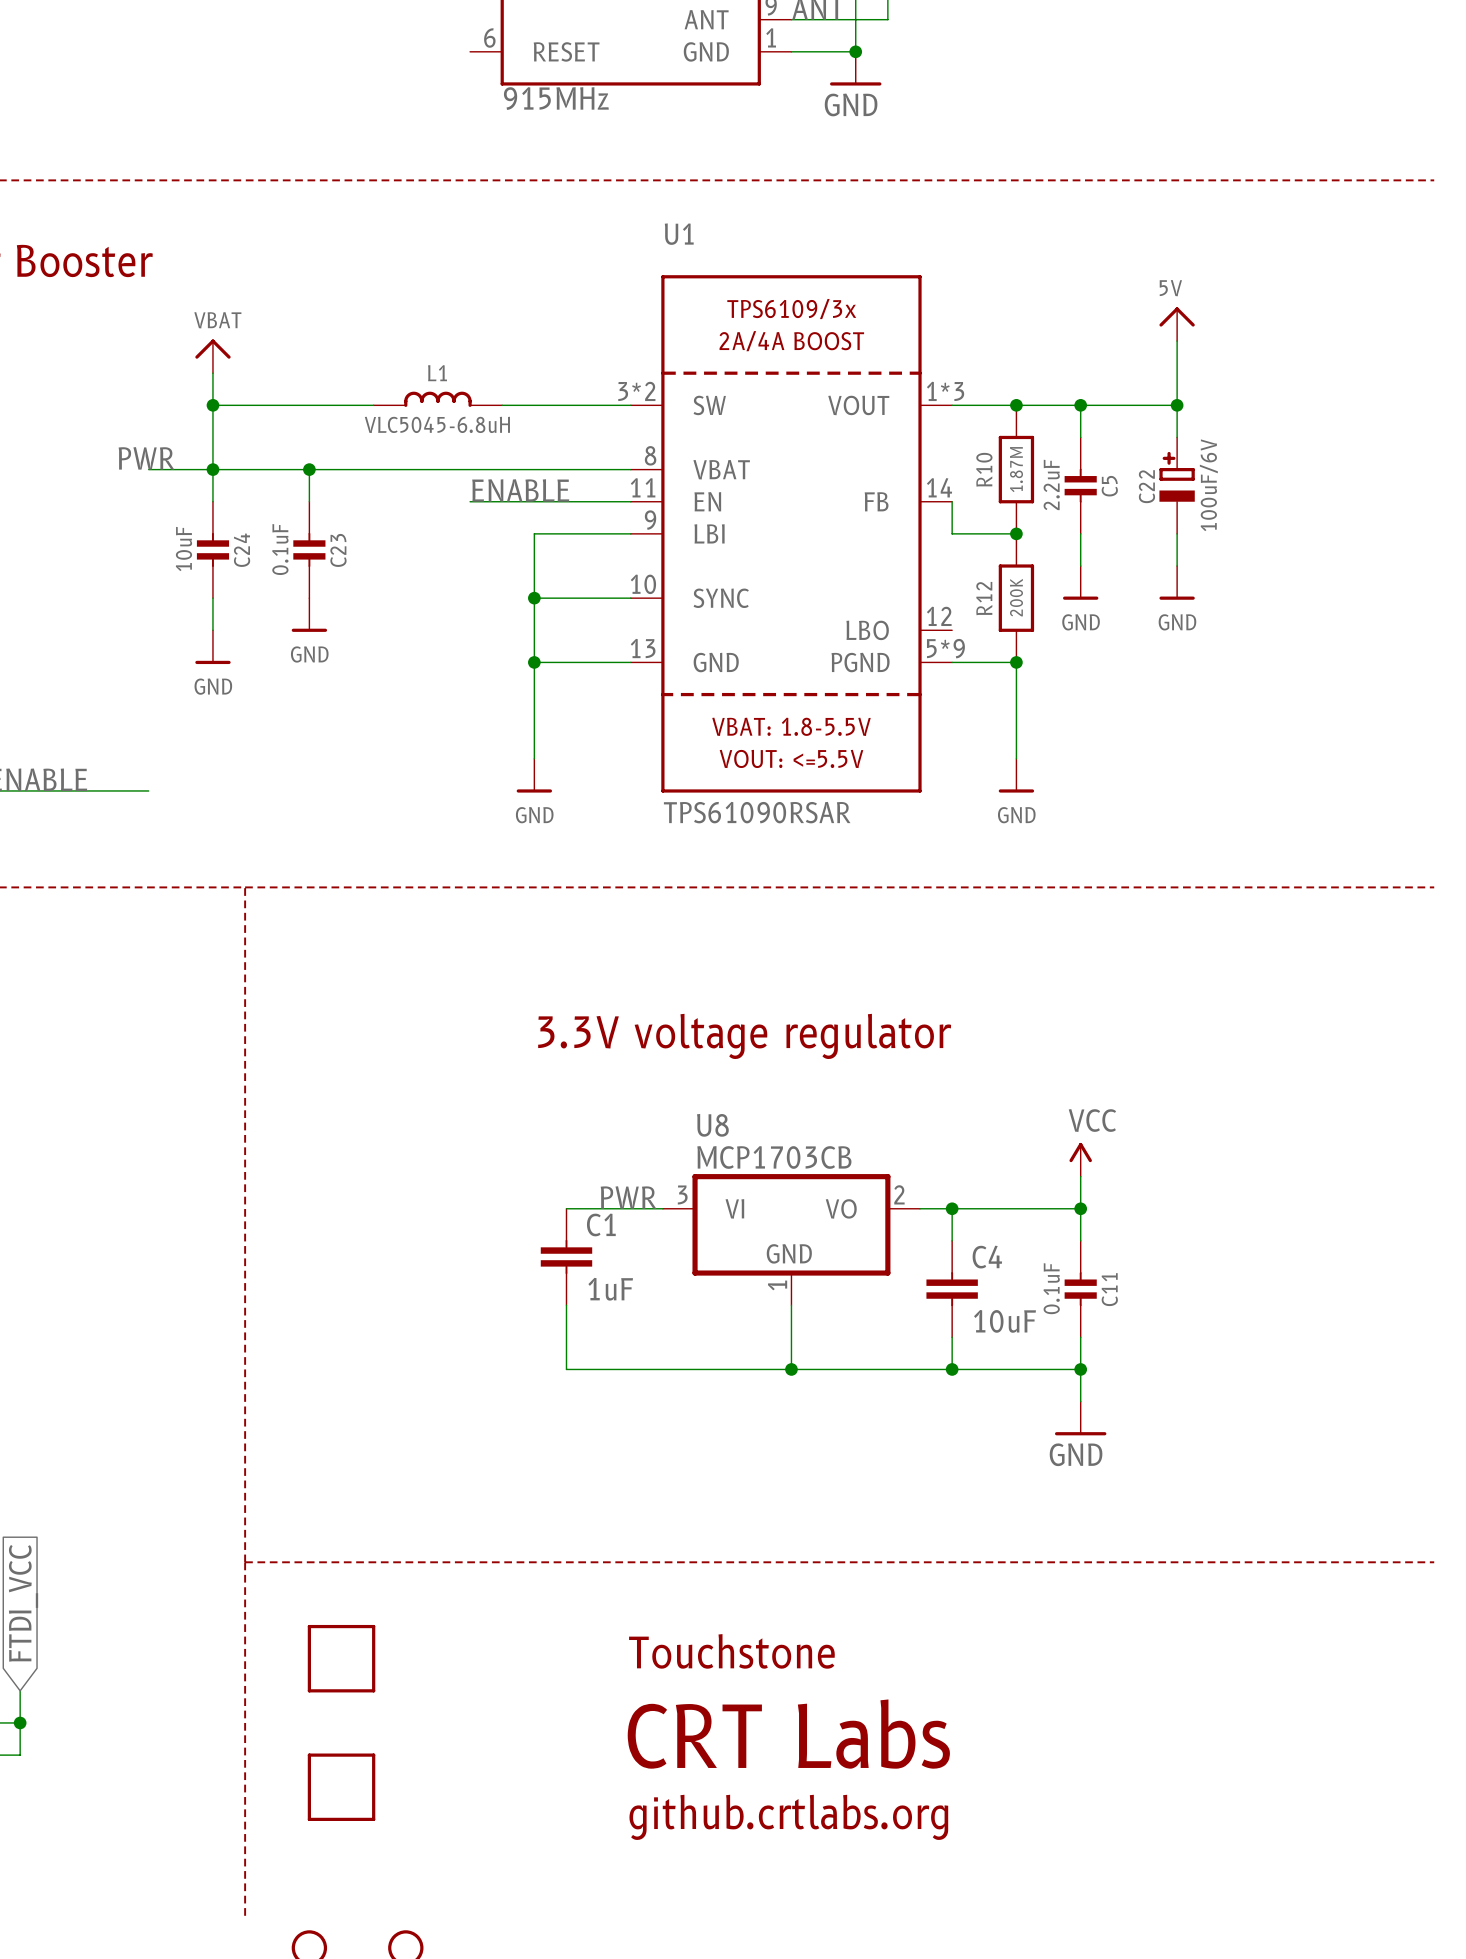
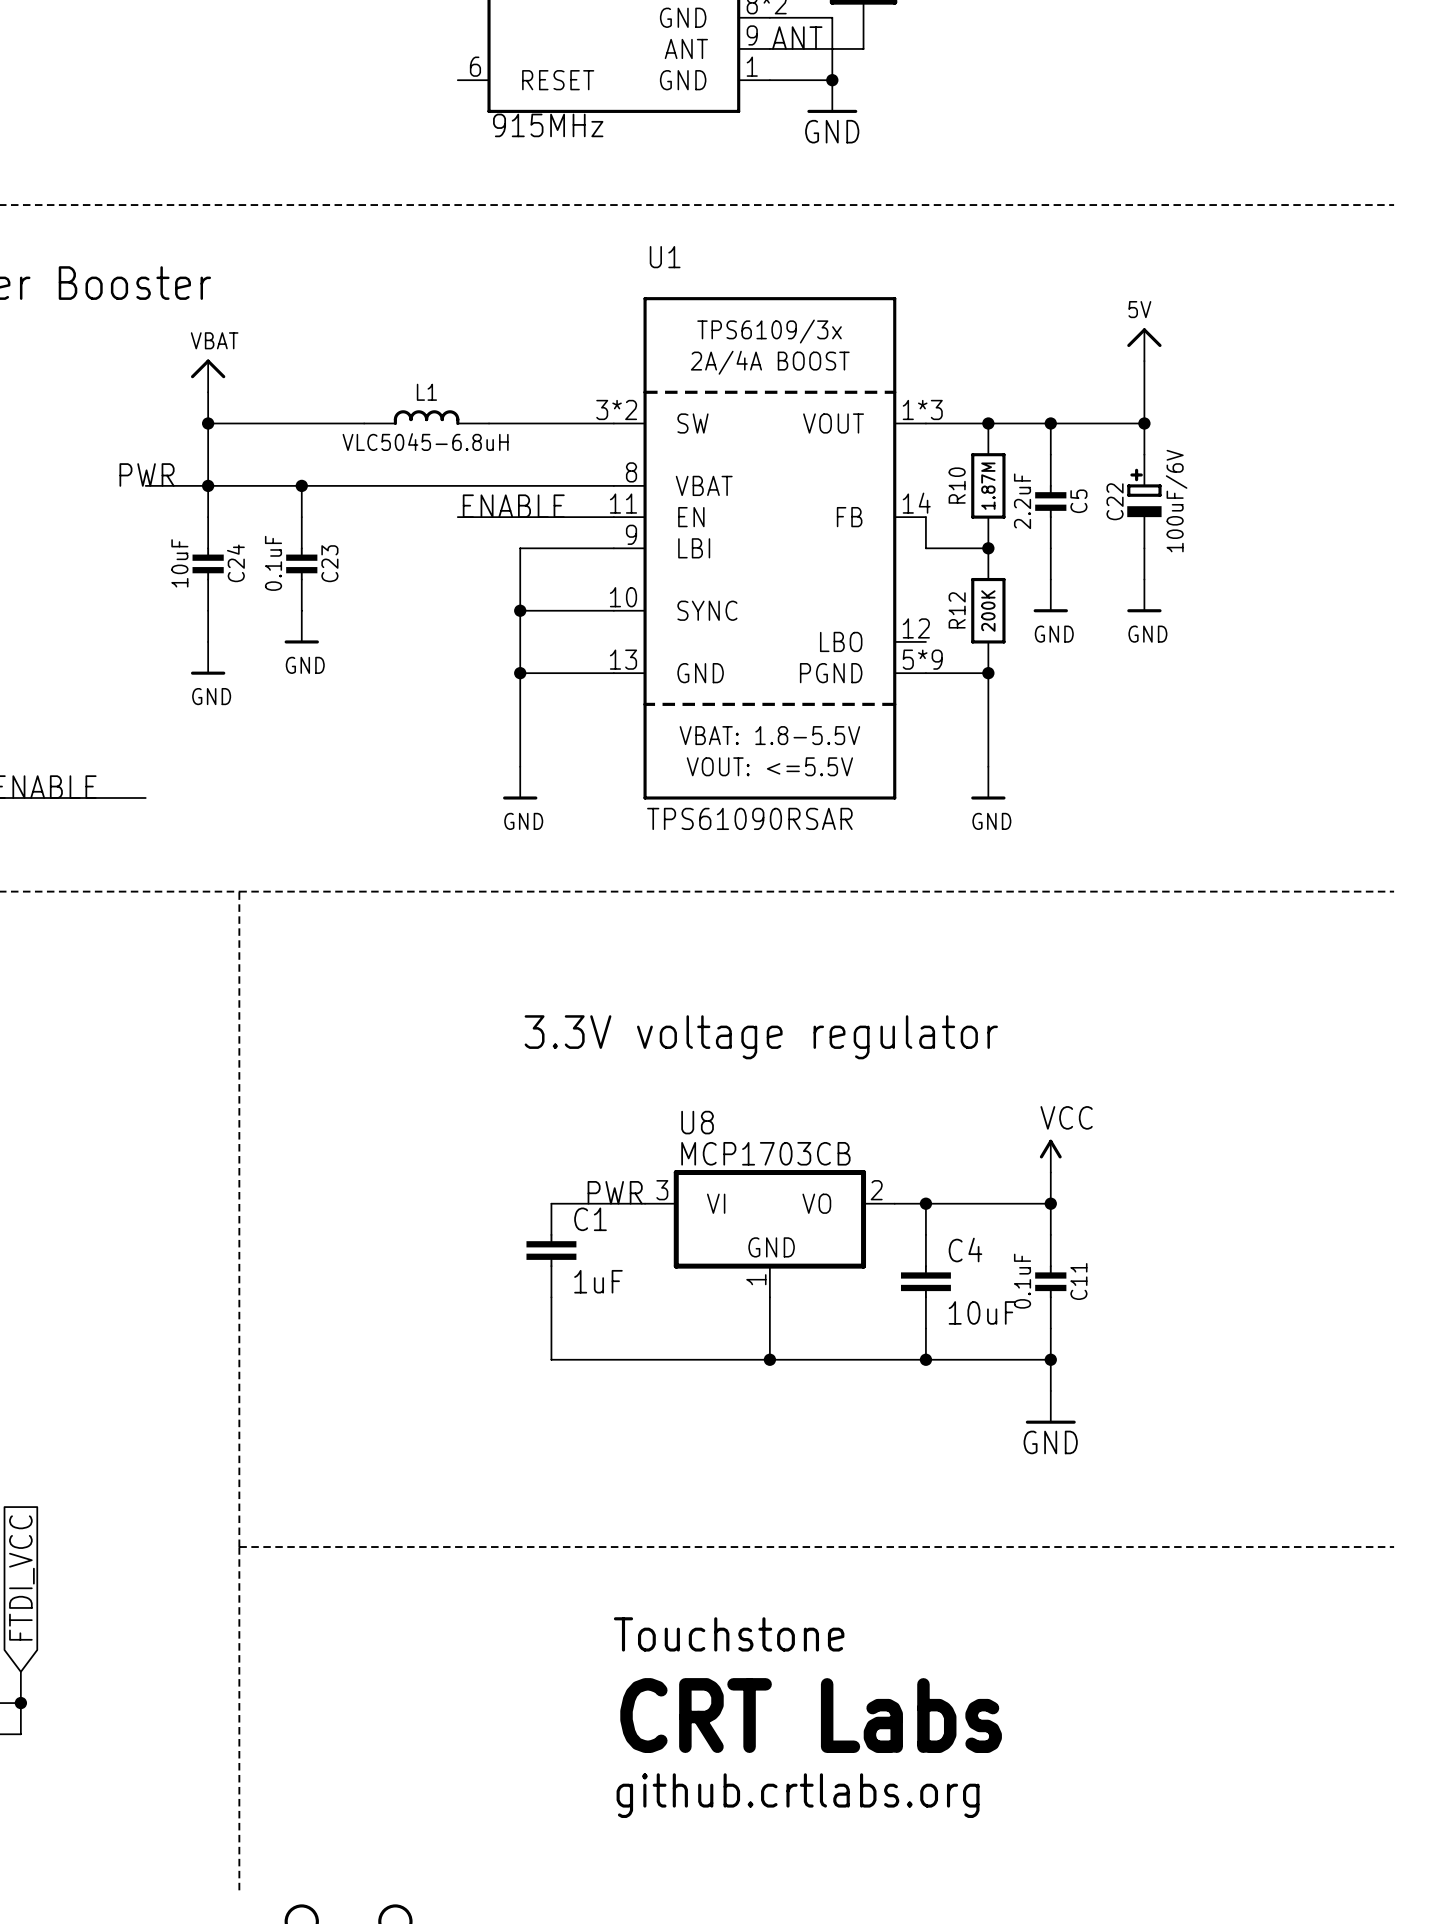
part: (341, 1658) -> none
part: (341, 1787) -> none

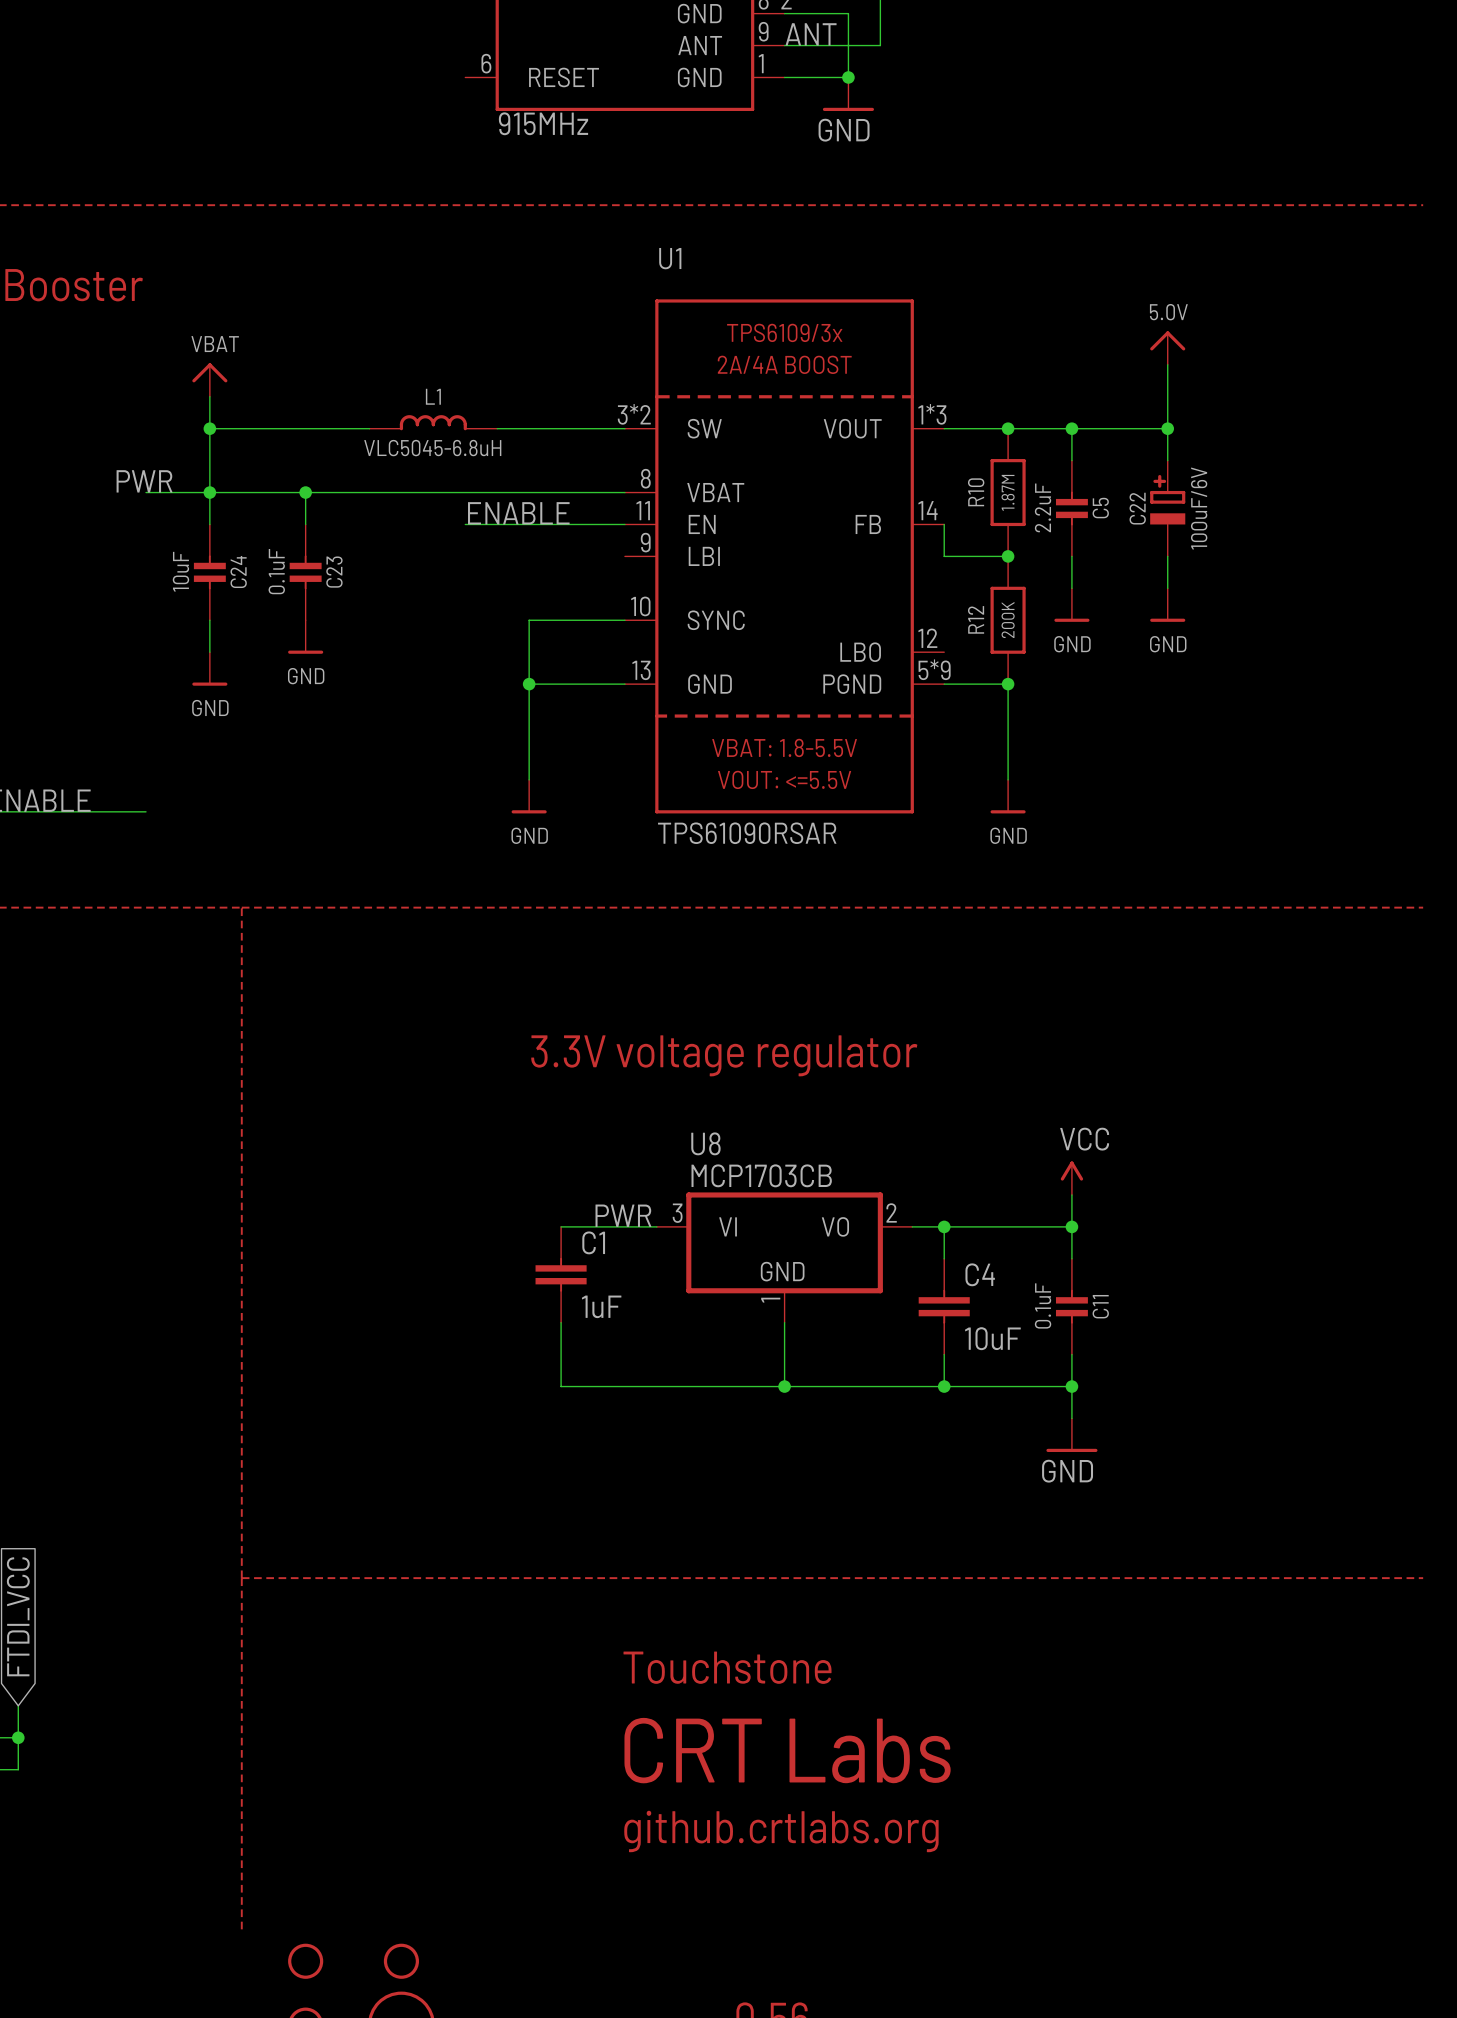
power symbol: 5V (1144, 344) -> 5.0V (1167, 348)
wire: (613, 548) (520, 548) (520, 610) -> none
junction: (520, 610) -> none

